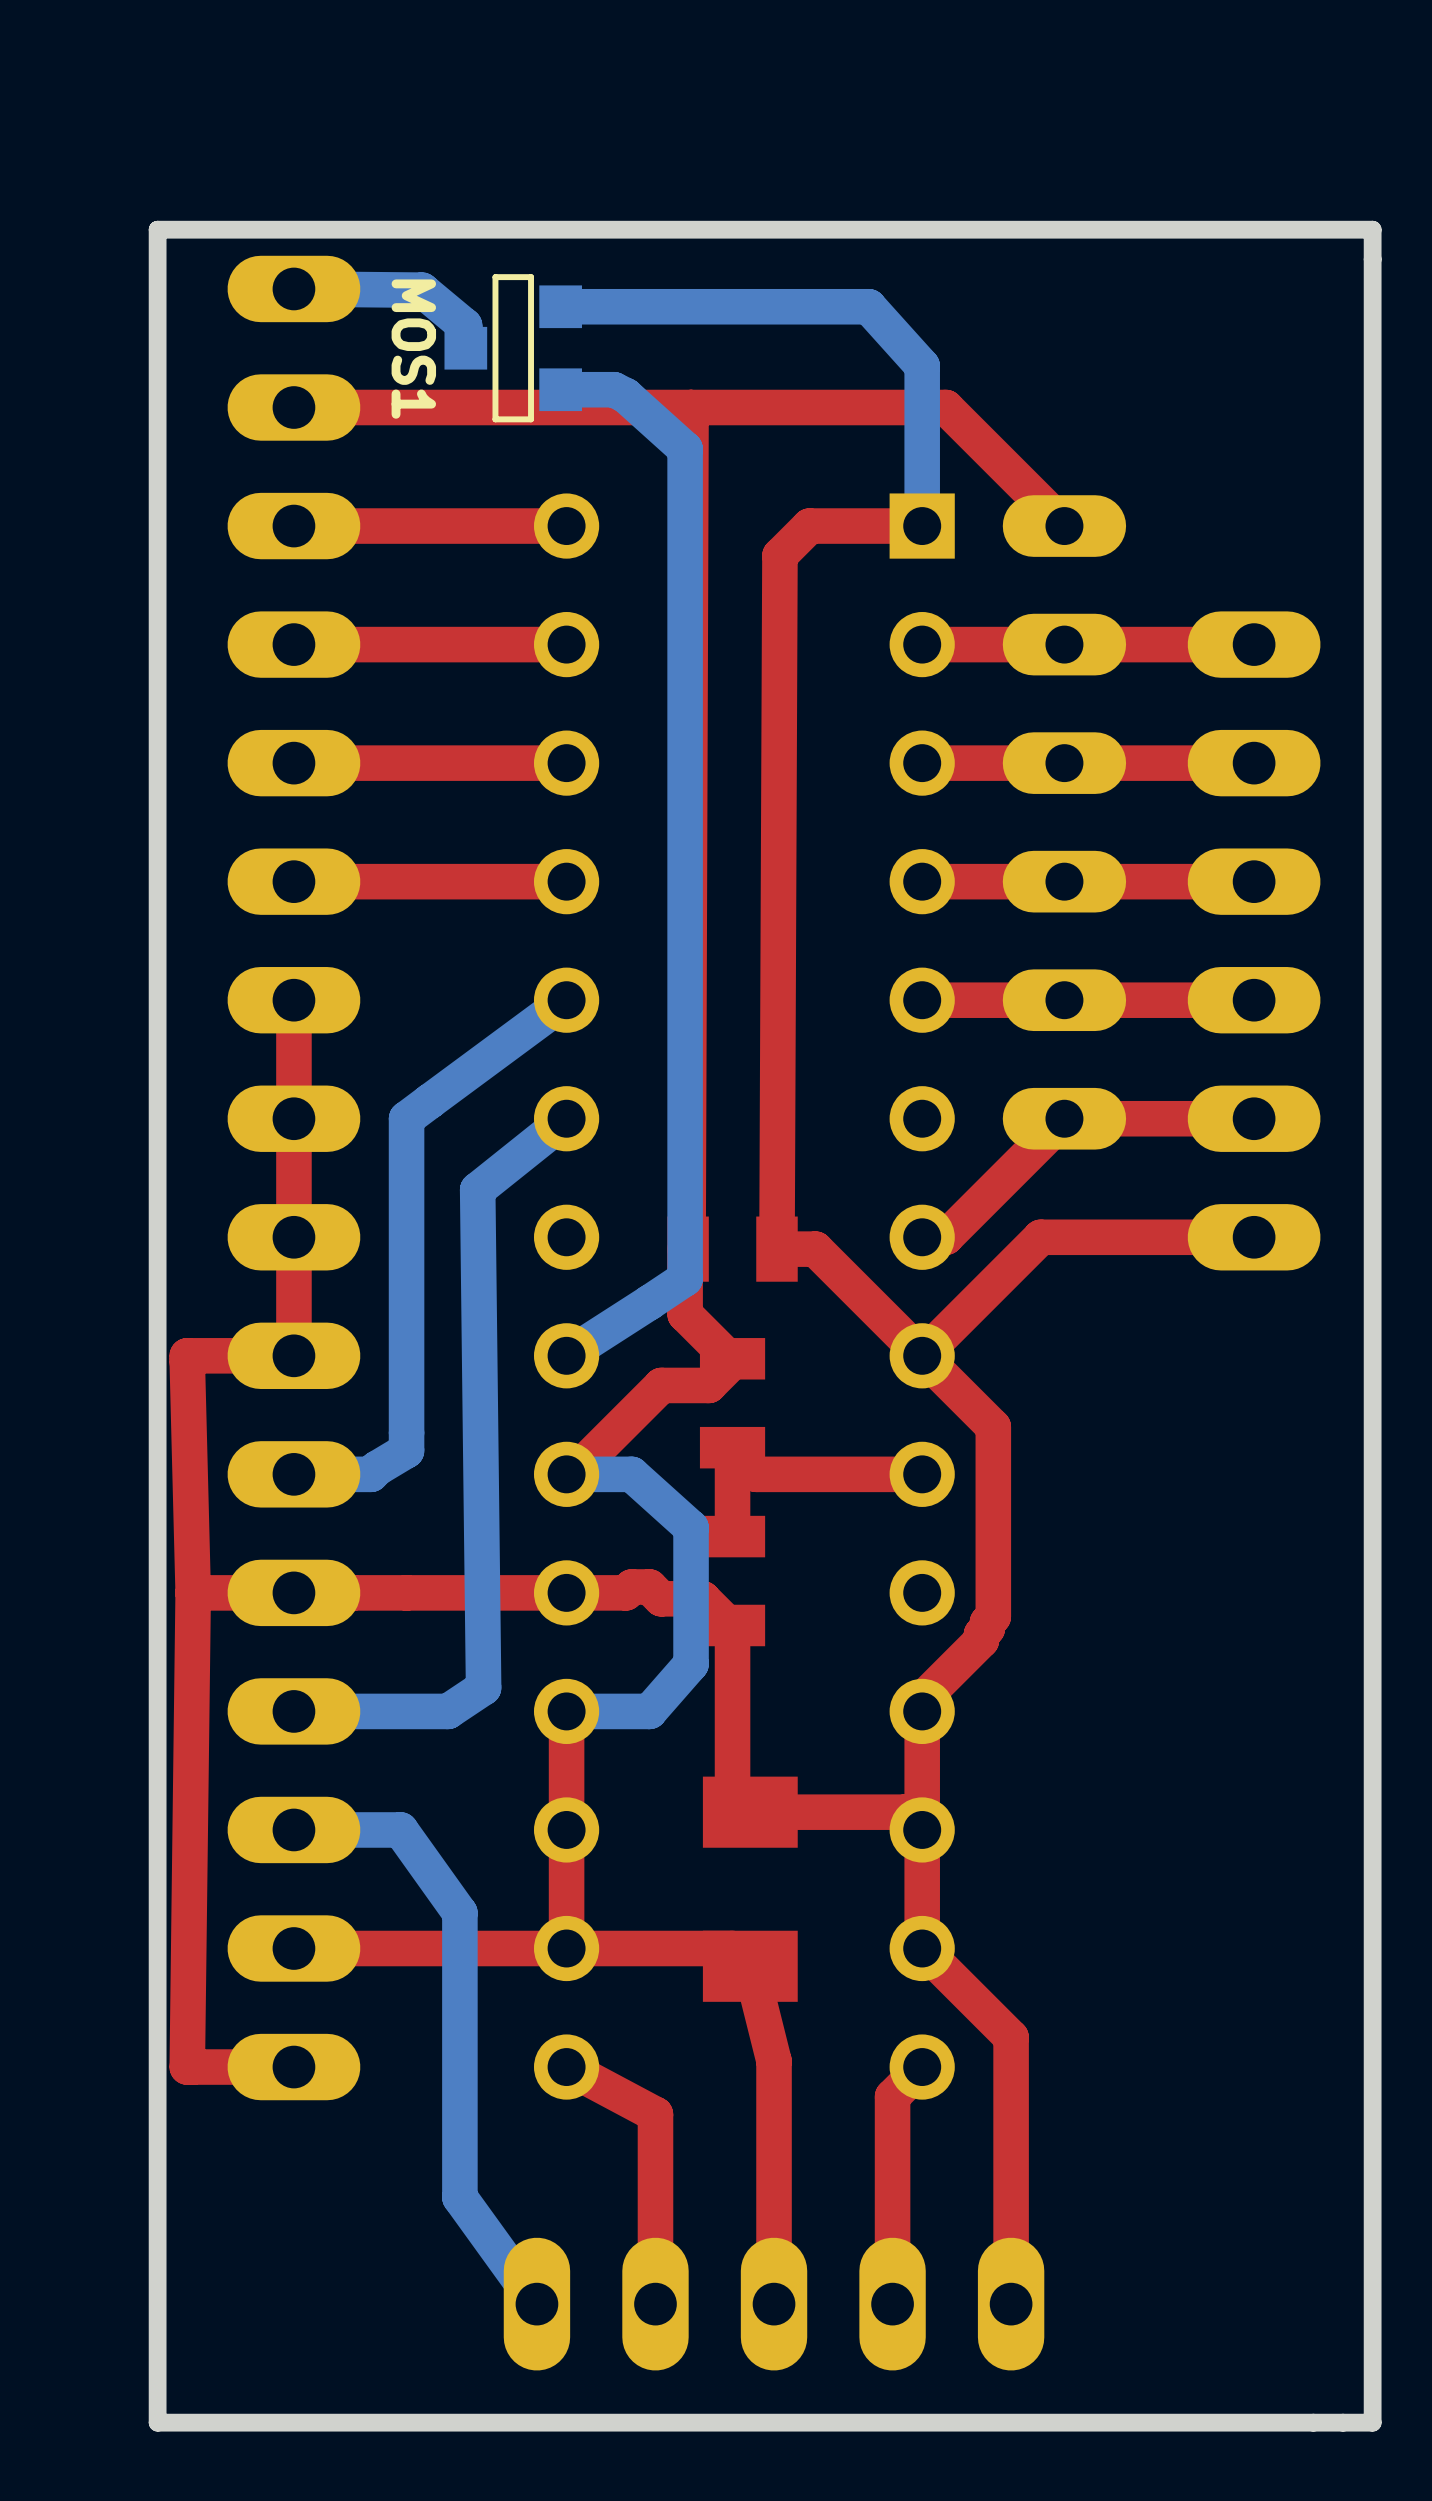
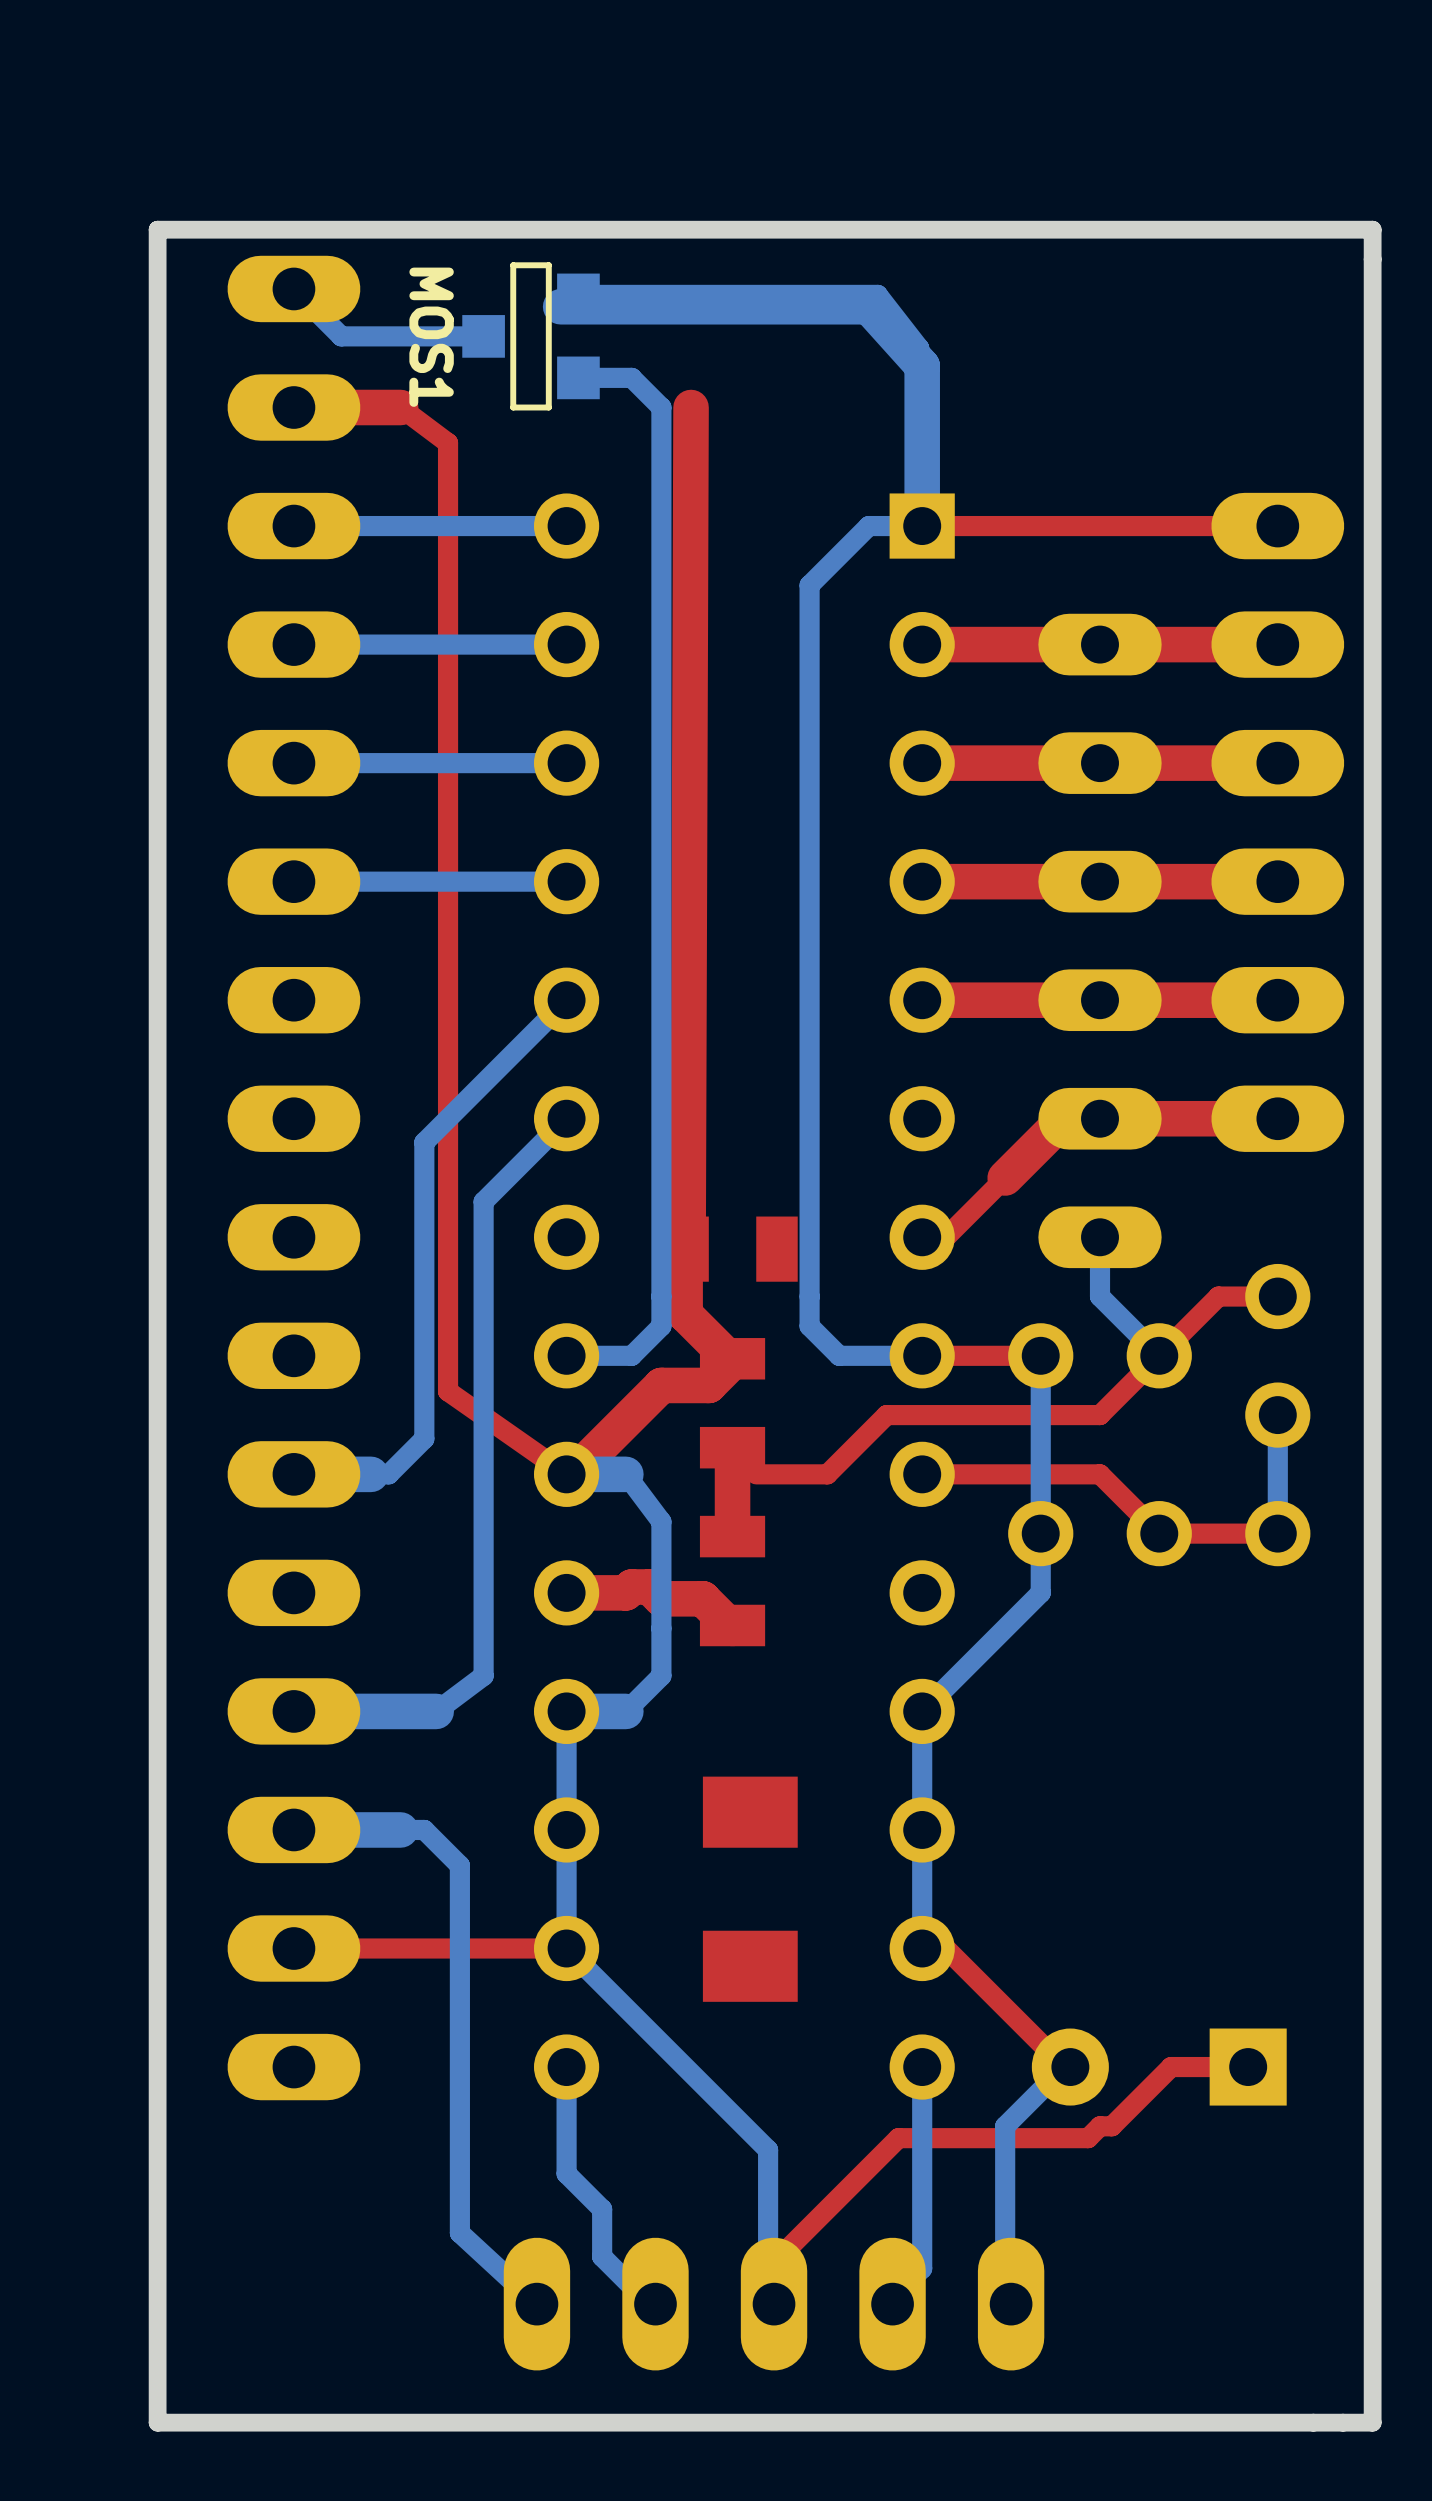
bottom track: (293, 288) (421, 290) (464, 325) (465, 348) -> (293, 288) (341, 336) (483, 336)
bottom track: none -> (578, 294) (877, 294) (919, 348) (922, 526) (868, 526) (809, 585) (809, 1326) (839, 1355) (922, 1355)
MOS1 position: (513, 348) -> (531, 336)
bottom track: (560, 389) (614, 389) (625, 395) (685, 449) (685, 1278) (566, 1355) -> (578, 377) (631, 377) (661, 407) (661, 1326) (631, 1355) (566, 1355)
top track: (400, 407) (945, 407) (1064, 526) -> (400, 407) (448, 443) (448, 1391) (566, 1474)
top track: (566, 526) (293, 526) -> none
bottom track: none -> (566, 526) (293, 526)
top track: (922, 526) (809, 526) (779, 555) (776, 1249) (815, 1249) (993, 1426) (993, 1616) (987, 1622) (987, 1628) (981, 1634) (981, 1640) (922, 1699) (922, 1948) (1011, 2037) (1011, 2304) -> (922, 526) (1277, 526)
top track: (566, 644) (293, 644) -> none
bottom track: none -> (566, 644) (293, 644)
top track: (566, 763) (293, 763) -> none
bottom track: none -> (566, 763) (293, 763)
part position: (1064, 822) -> (1100, 940)
top track: (566, 881) (293, 881) -> none
bottom track: none -> (566, 881) (293, 881)
part position: (1254, 940) -> (1277, 822)
top track: (293, 1000) (293, 1355) (187, 1355) (193, 1592) -> none
bottom track: (566, 1000) (406, 1118) (406, 1450) (376, 1468) (370, 1474) -> (566, 1000) (424, 1142) (424, 1438) (388, 1474) (370, 1474)
bottom track: (566, 1118) (477, 1189) (483, 1687) (448, 1711) (436, 1711) -> (566, 1118) (483, 1201) (483, 1675) (436, 1711)
top track width: thick (1005, 1178) (945, 1237) (922, 1237) -> thin (1005, 1178) (945, 1237) (922, 1237)
bottom track: none -> (1100, 1237) (1100, 1296) (1159, 1355)
top track: (1254, 1237) (1040, 1237) (922, 1355) -> (1040, 1355) (922, 1355)
bottom track: none -> (1040, 1355) (1040, 1592) (922, 1711) (922, 1948)
part: none -> (1100, 1355)
part: none -> (1277, 1355)
bottom track: none -> (1277, 1415) (1277, 1533)
bottom track: (625, 1474) (631, 1474) (691, 1527) (691, 1664) (649, 1711) (625, 1711) -> (625, 1474) (661, 1521) (661, 1675) (625, 1711)
top track width: thick (827, 1474) (756, 1474) -> thin (827, 1474) (756, 1474)
top track: (922, 1474) (827, 1474) -> (1277, 1296) (1218, 1296) (1100, 1415) (886, 1415) (827, 1474)
top track: none -> (922, 1474) (1100, 1474) (1159, 1533) (1277, 1533)
part: none -> (1159, 1533)
top track: (193, 1592) (187, 2067) (293, 2067) -> none
top track: (566, 1592) (193, 1592) -> none
top track: (732, 1625) (732, 1794) (750, 1812) (904, 1812) (922, 1829) -> none
top track: (566, 1711) (566, 1948) (732, 1948) (750, 1966) (774, 2061) (774, 2304) -> (1248, 2067) (1171, 2067) (1111, 2126) (1100, 2126) (1088, 2138) (898, 2138) (768, 2268) (768, 2304) (774, 2304)
bottom track: none -> (566, 1711) (566, 1948) (768, 2150) (768, 2304) (774, 2304)
bottom track: (400, 1829) (459, 1912) -> (400, 1829) (424, 1829) (459, 1865) (459, 1912)
bottom track width: thick (459, 1912) (459, 2197) -> thin (459, 1912) (459, 2197)
top track width: thick (566, 1948) (293, 1948) -> thin (566, 1948) (293, 1948)
top track: none -> (922, 1948) (945, 1948) (1064, 2067) (1070, 2067)
top track: (566, 2067) (655, 2114) (655, 2304) -> none
bottom track: none -> (566, 2067) (566, 2173) (602, 2209) (602, 2256) (649, 2304) (655, 2304)
top track: (922, 2067) (892, 2096) (892, 2304) -> none
bottom track: none -> (922, 2067) (922, 2268) (886, 2304) (892, 2304)
bottom track: none -> (1070, 2067) (1064, 2067) (1005, 2126) (1005, 2304) (1011, 2304)
part: none -> (1159, 2067)
bottom track: (459, 2197) (536, 2304) -> (459, 2197) (459, 2232) (536, 2304)

